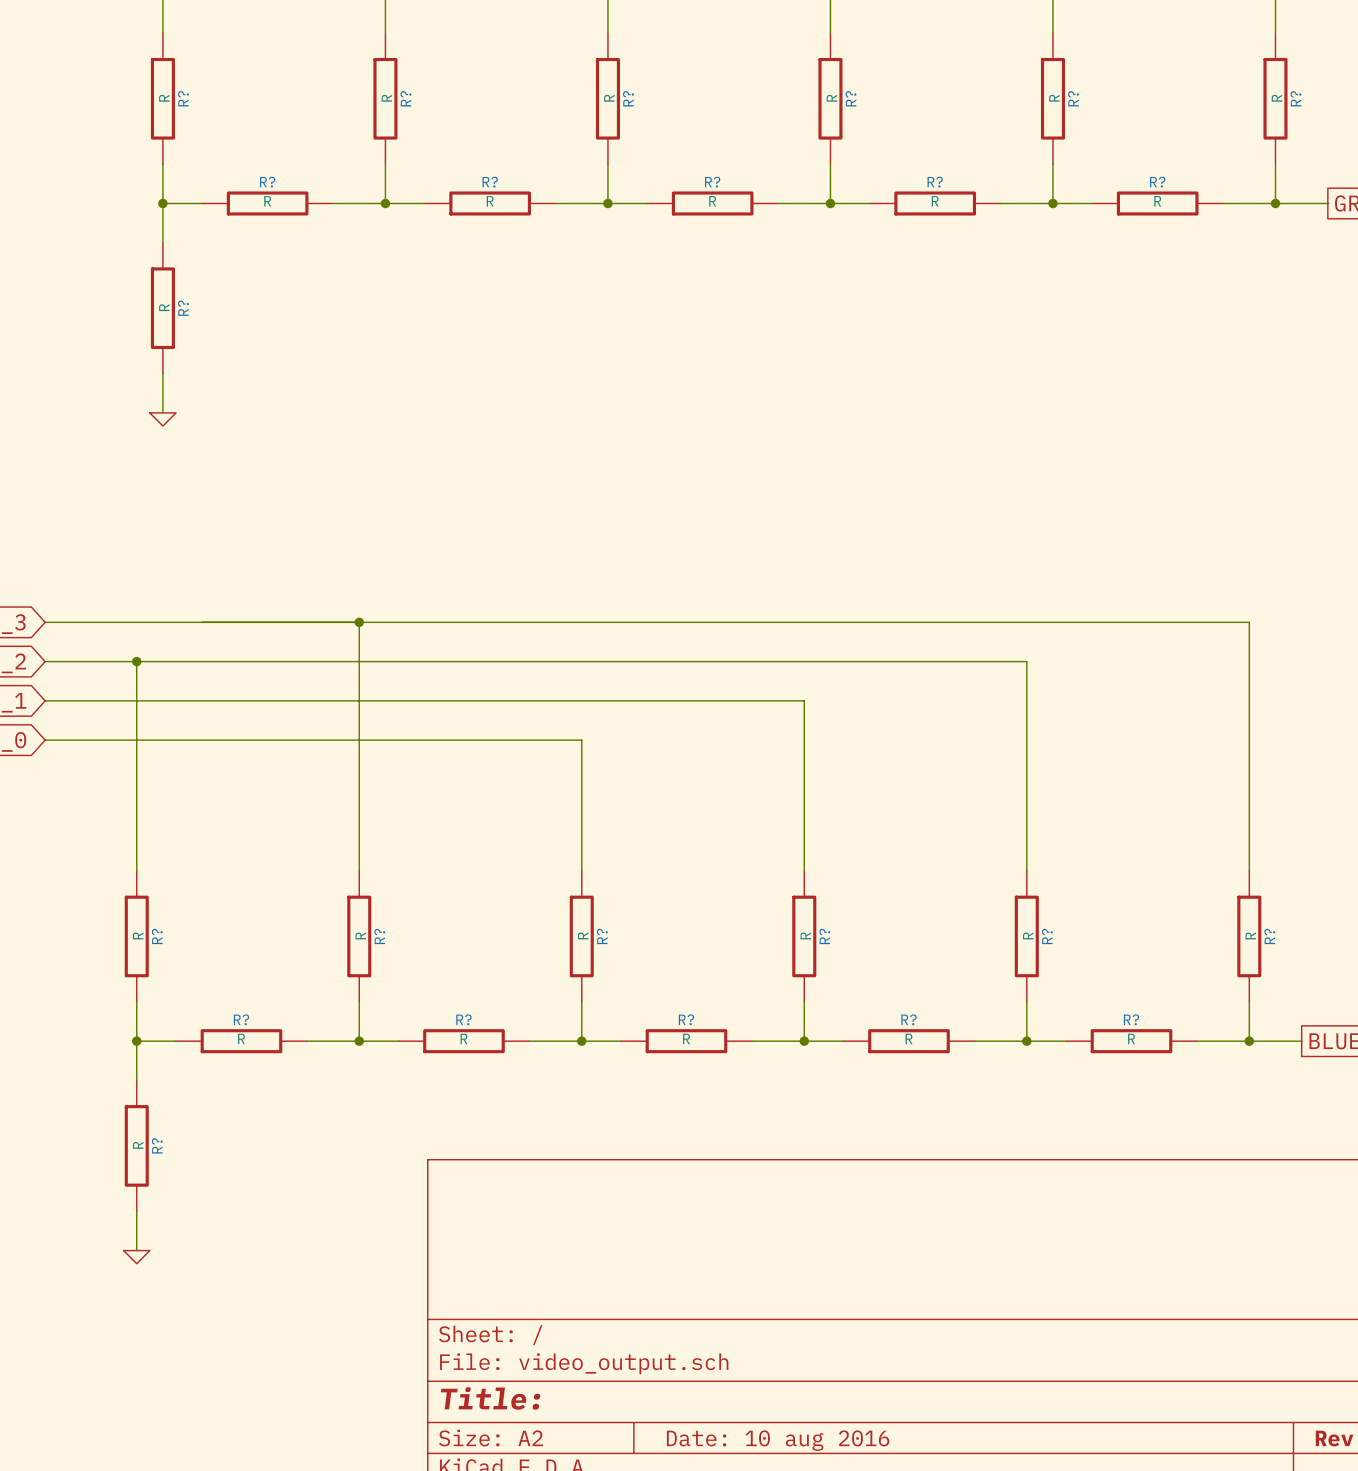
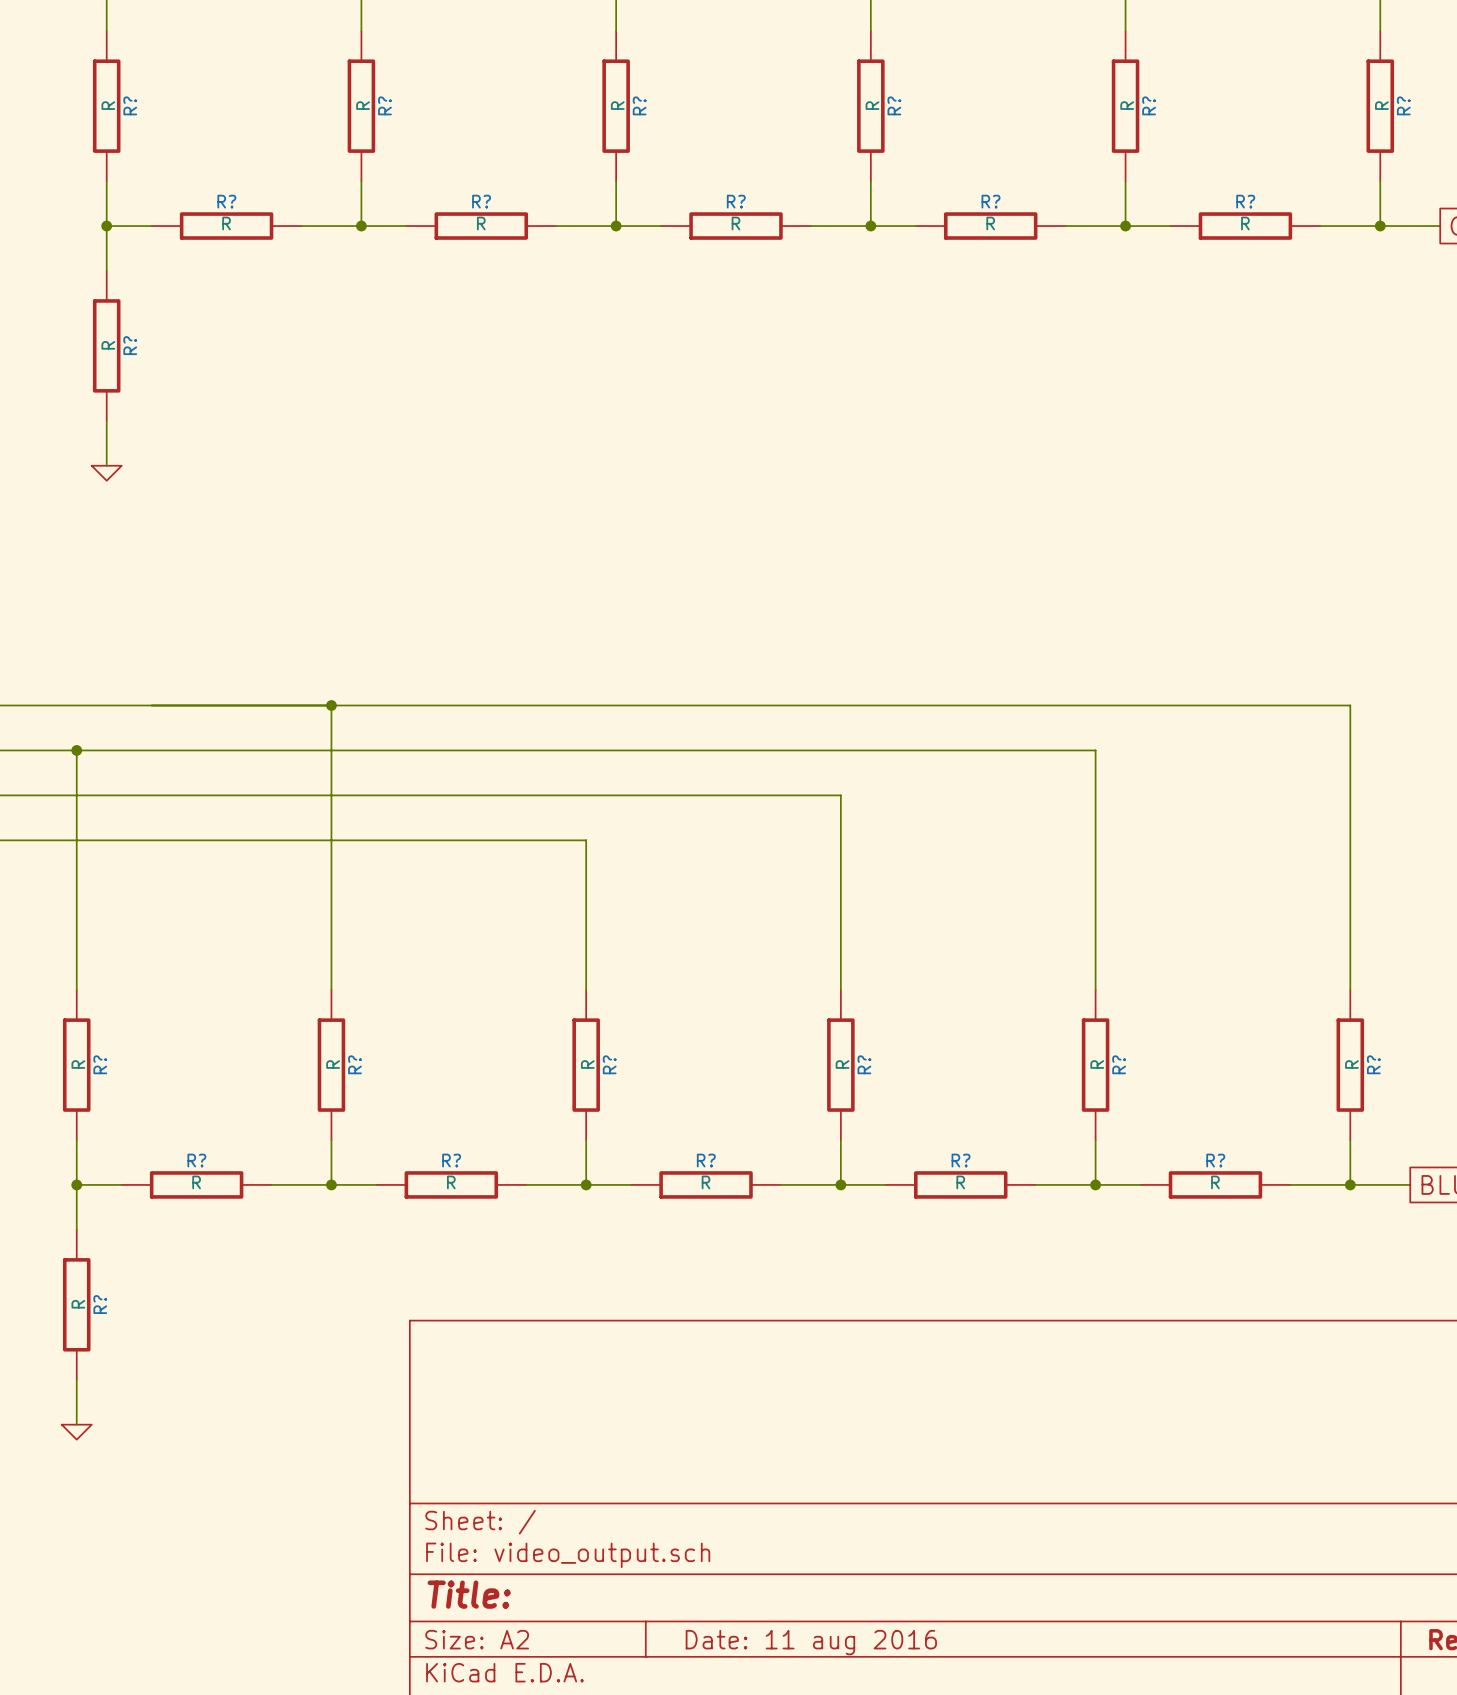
title block: Date: 10 aug 2016 (778, 1440) -> Date: 11 aug 2016 (811, 1642)

